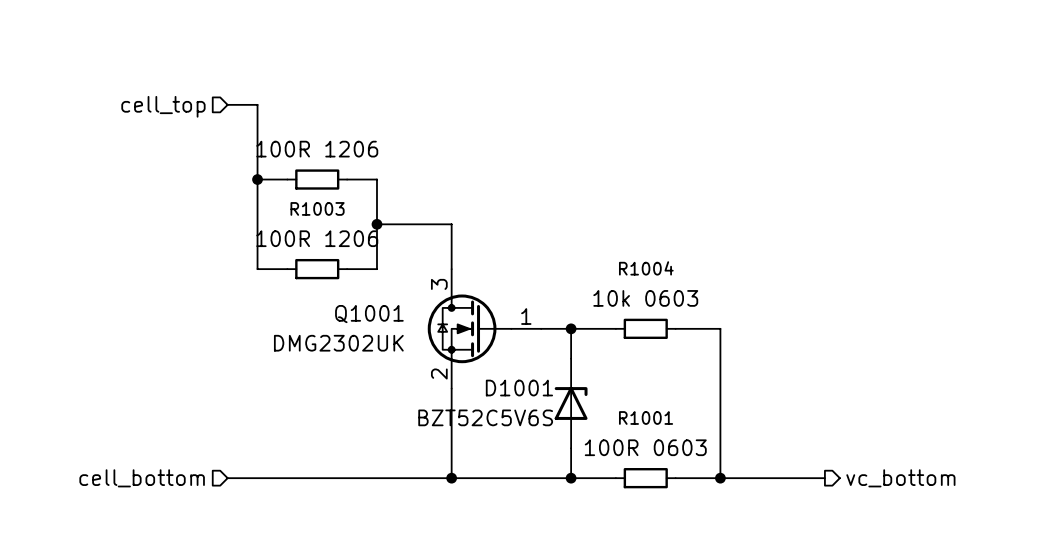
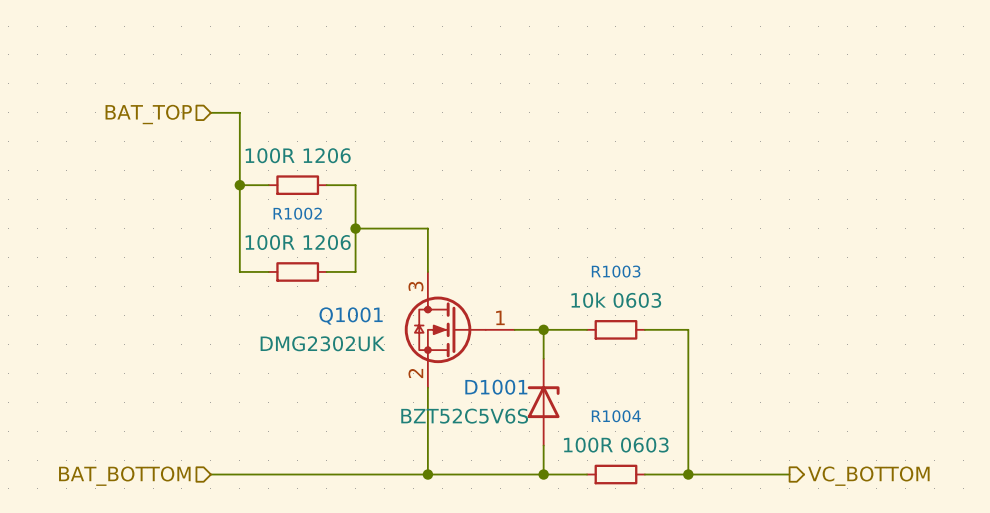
hierarchical label: cell_top (163, 106) -> BAT_TOP (148, 114)
R1003 name: R1003 (317, 208) -> R1002 (297, 213)
R1004 name: R1004 (646, 268) -> R1003 (616, 271)
R1001 name: R1001 (646, 417) -> R1004 (616, 416)
hierarchical label: cell_bottom (142, 478) -> BAT_BOTTOM (124, 476)
hierarchical label: vc_bottom (900, 478) -> VC_BOTTOM (868, 476)

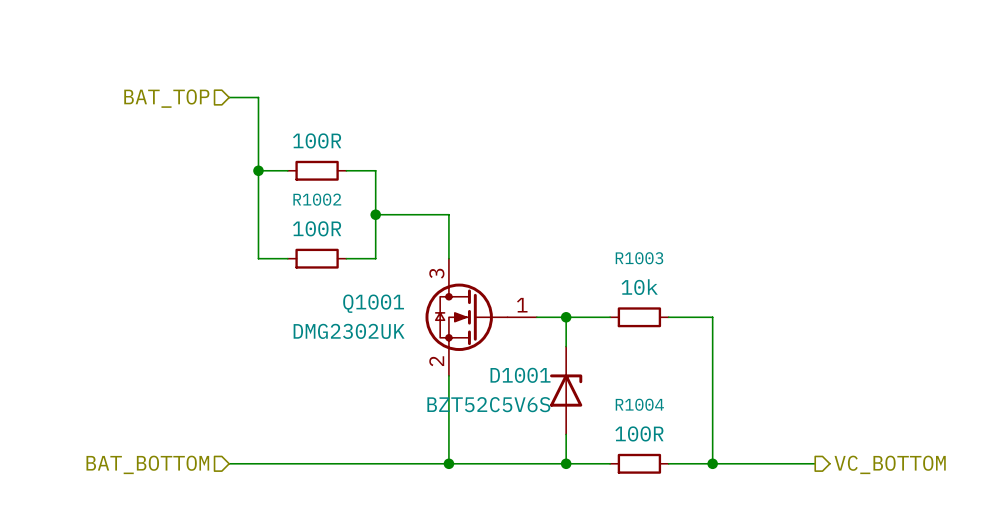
part value: 100R 1206 (298, 155) -> 100R (317, 140)
R1002 value: 100R 1206 (298, 242) -> 100R (317, 228)
R1003 value: 10k 0603 (616, 300) -> 10k (639, 287)
R1004 value: 100R 0603 (616, 445) -> 100R (639, 433)

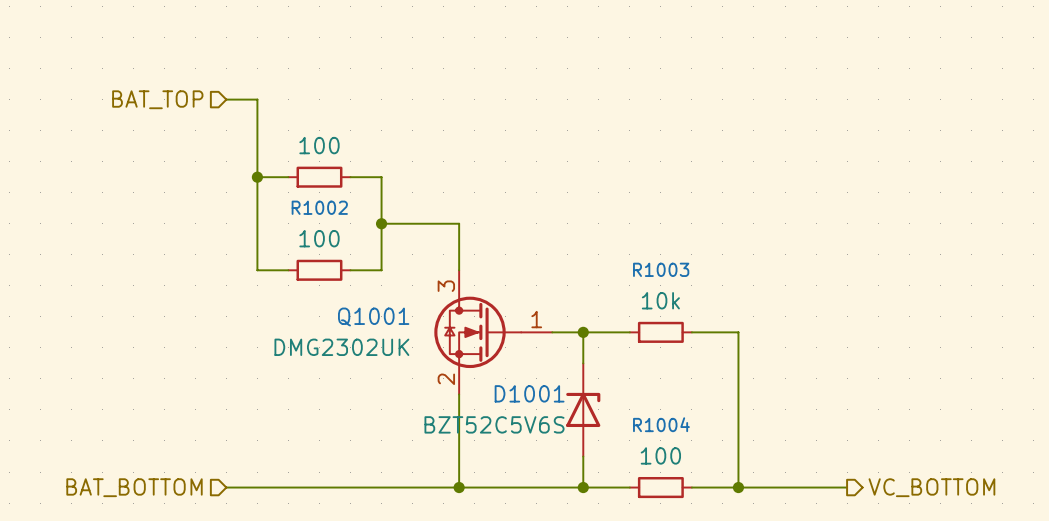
part value: 100R (317, 140) -> 100 (319, 145)
R1002 value: 100R (317, 228) -> 100 (319, 238)
R1004 value: 100R (639, 433) -> 100 (660, 455)

